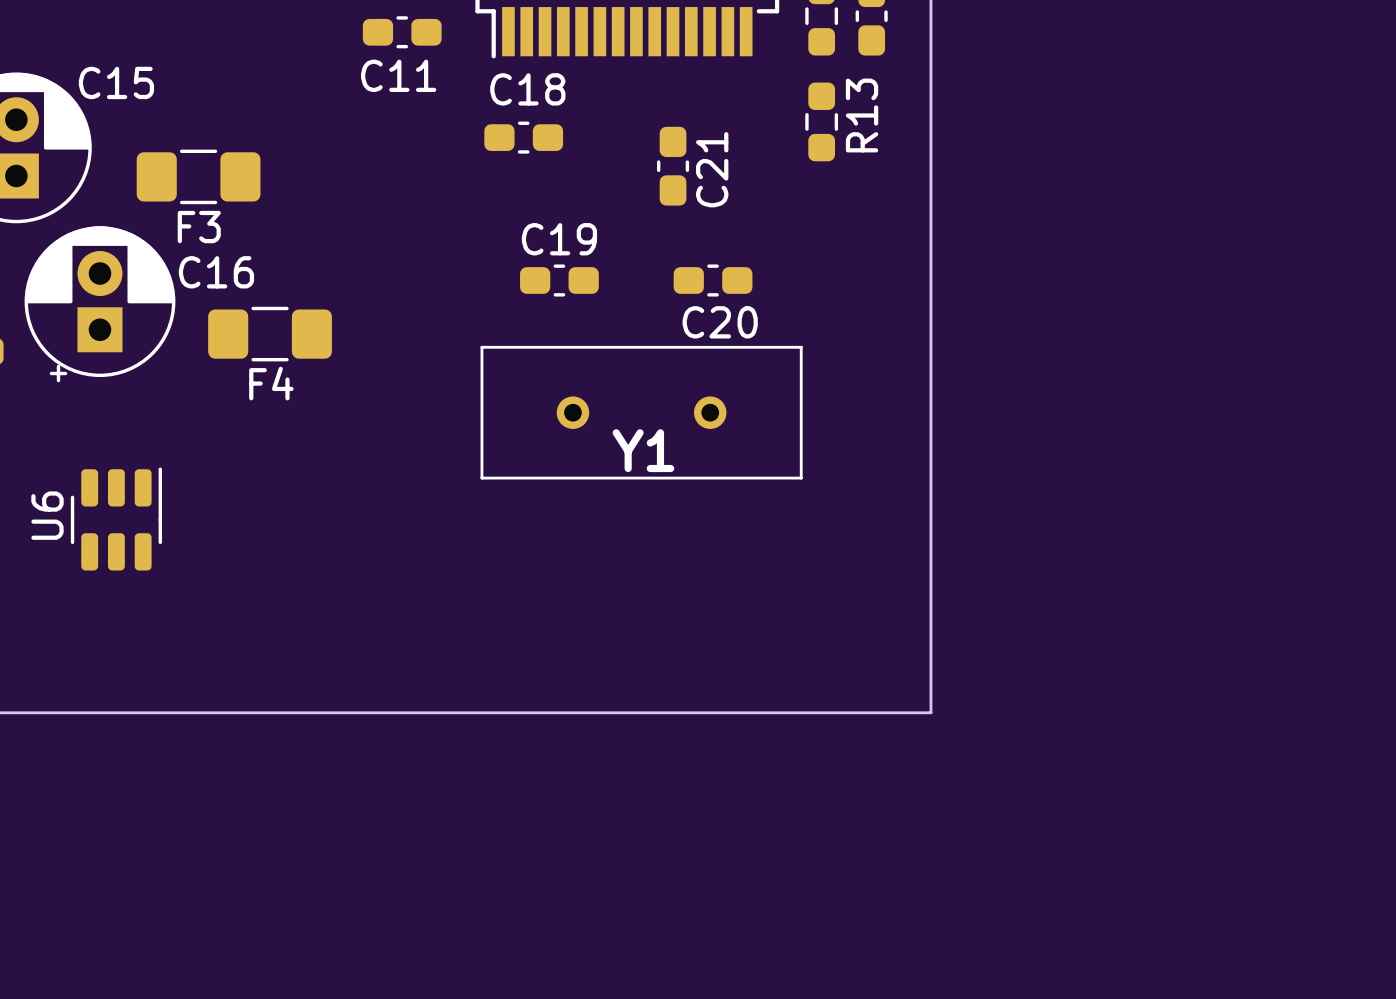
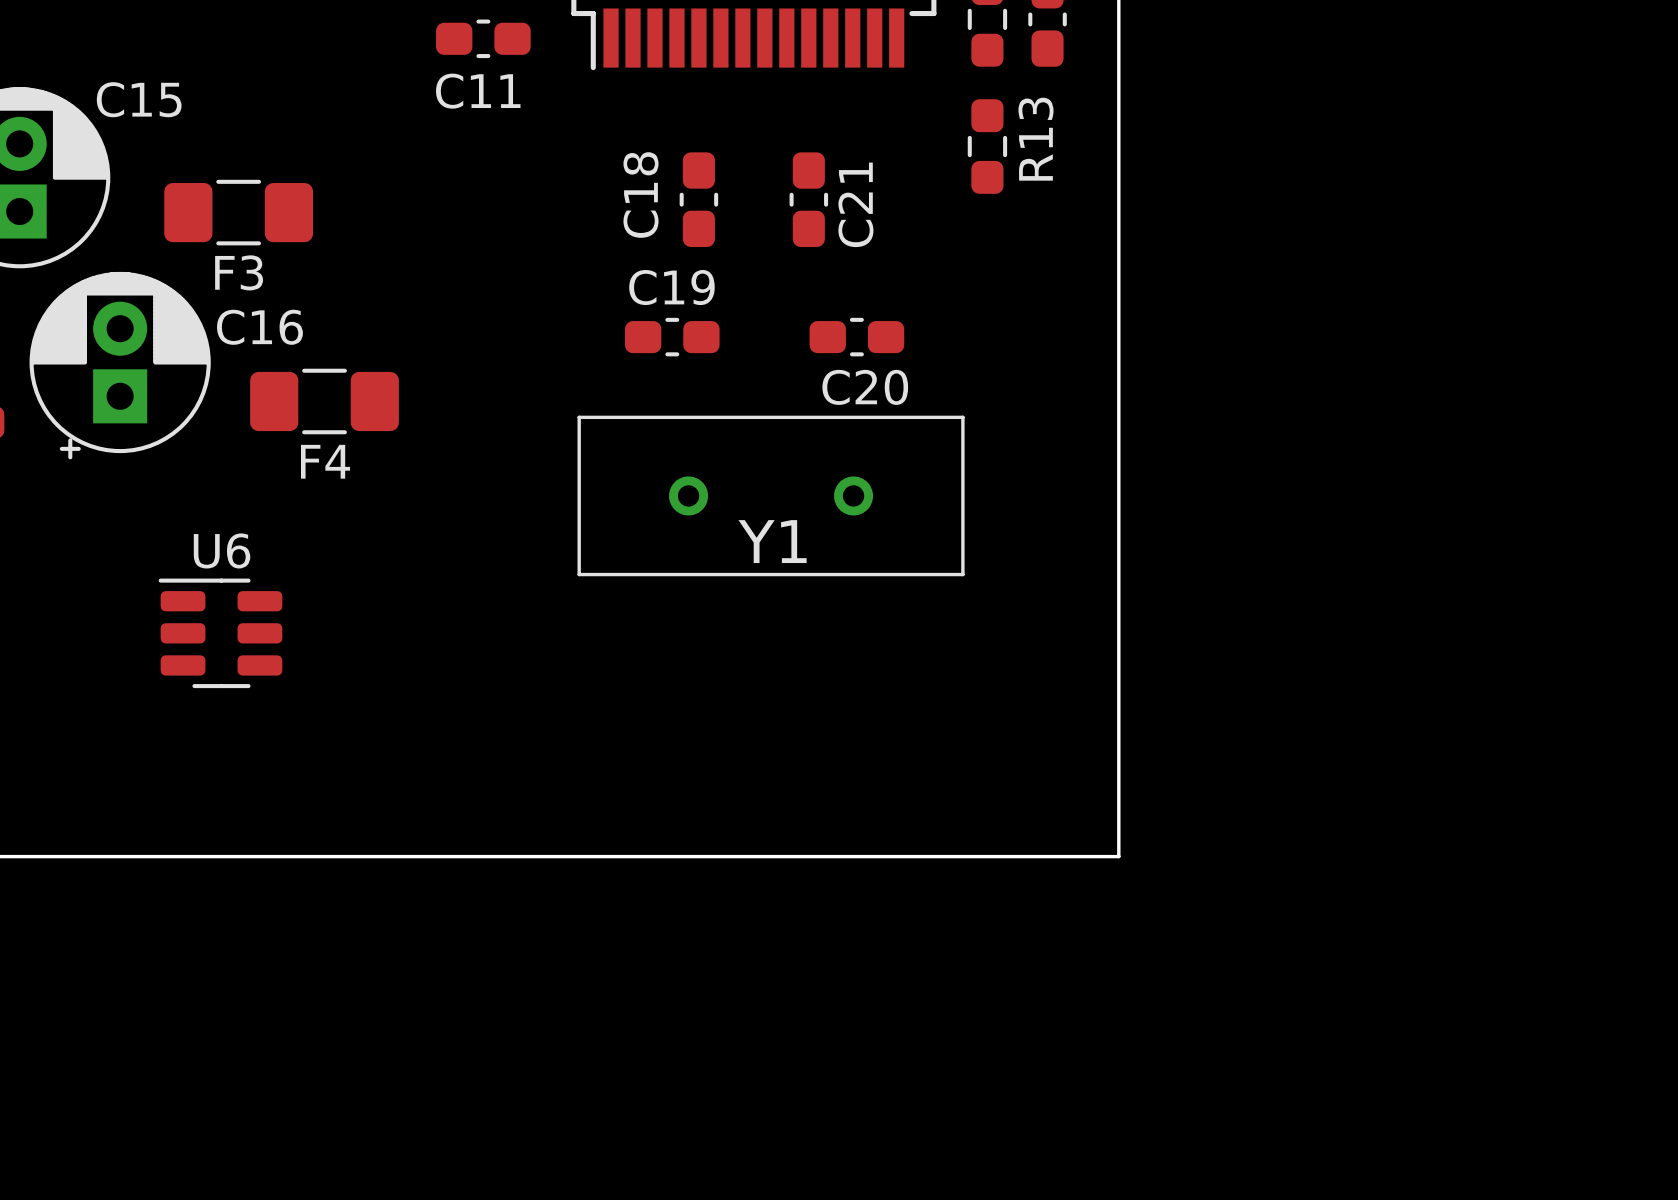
C18 name position: C18 (527, 89) -> C18 (641, 195)
C18 rotation: 0° (523, 137) -> 90° clockwise (698, 199)
C18 position: (523, 137) -> (698, 199)
U6 name position: U6 (47, 515) -> U6 (222, 550)
U6 rotation: 0° (116, 519) -> 90° counterclockwise (220, 633)
U6 position: (116, 519) -> (220, 633)

